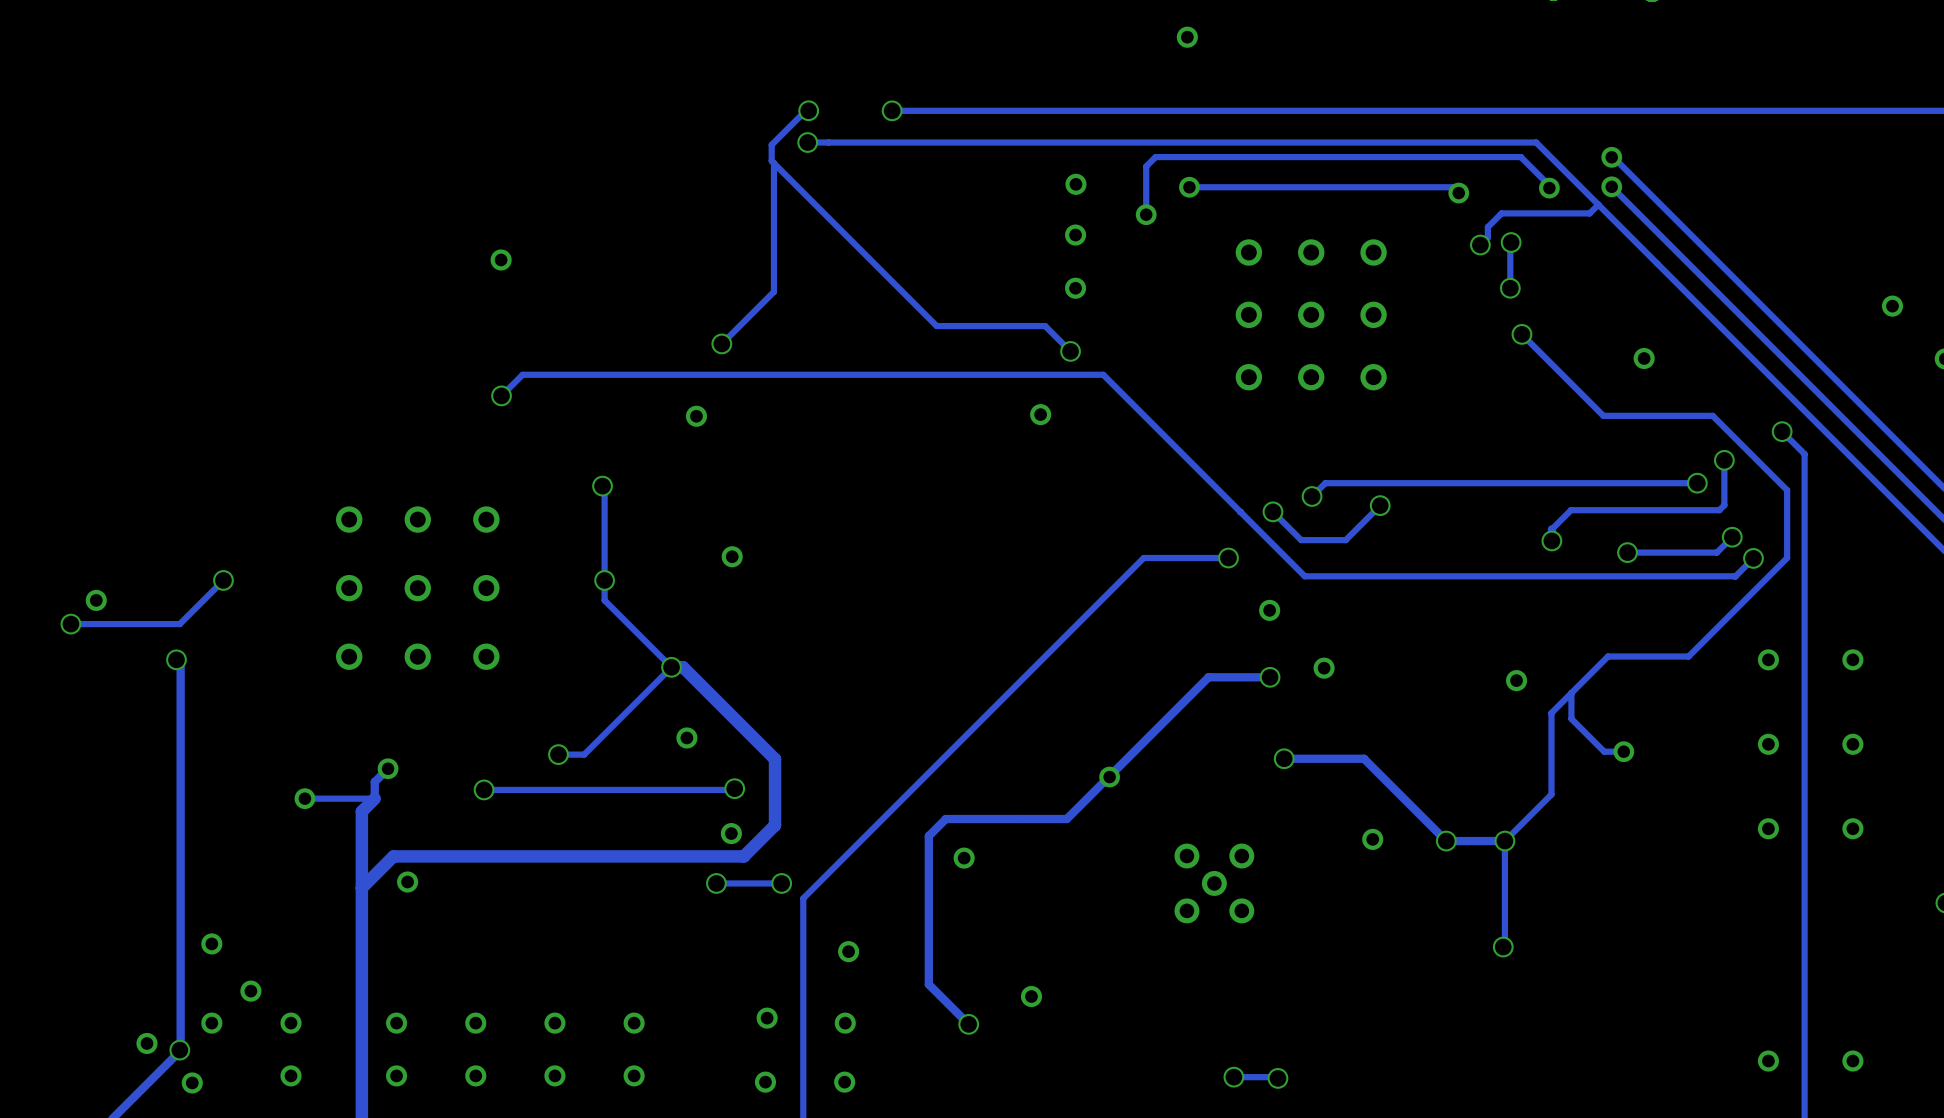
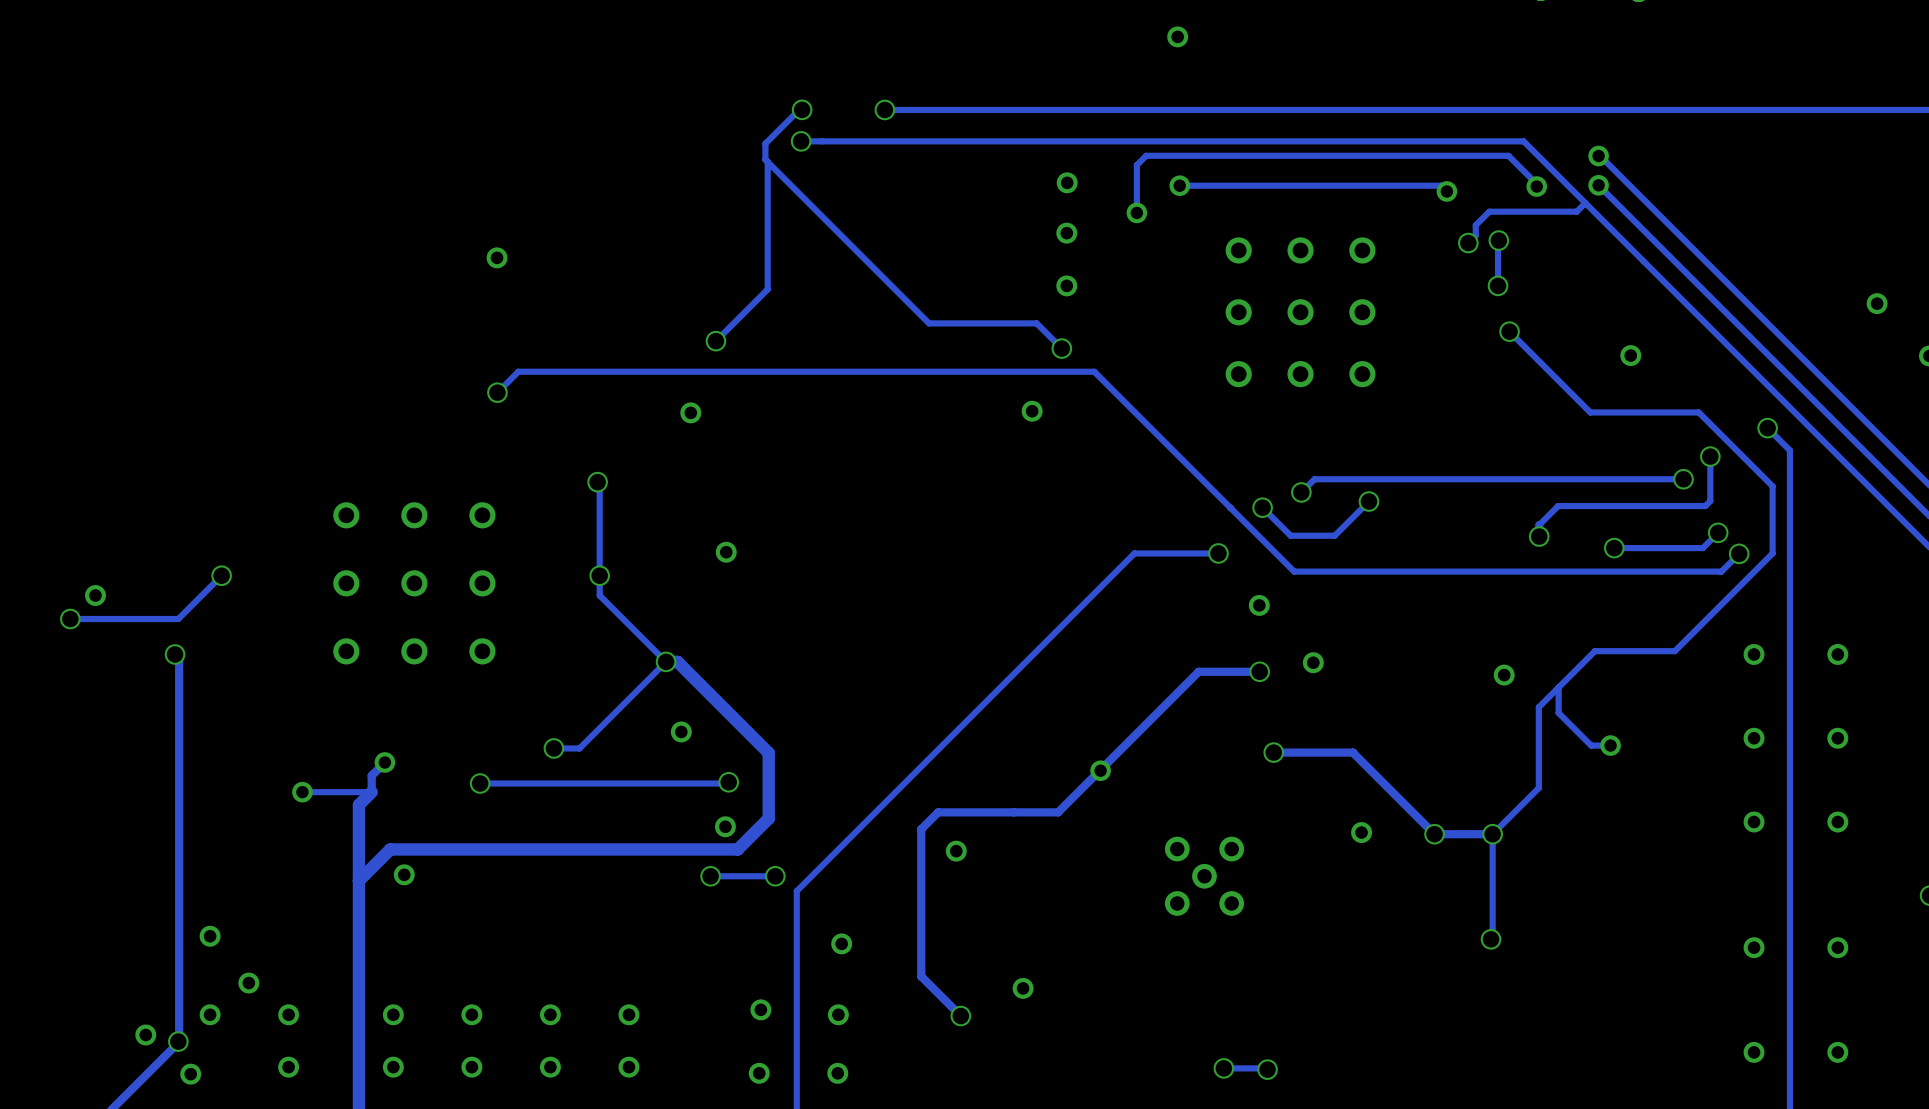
part: none -> (1754, 947)
part: none -> (1837, 947)

